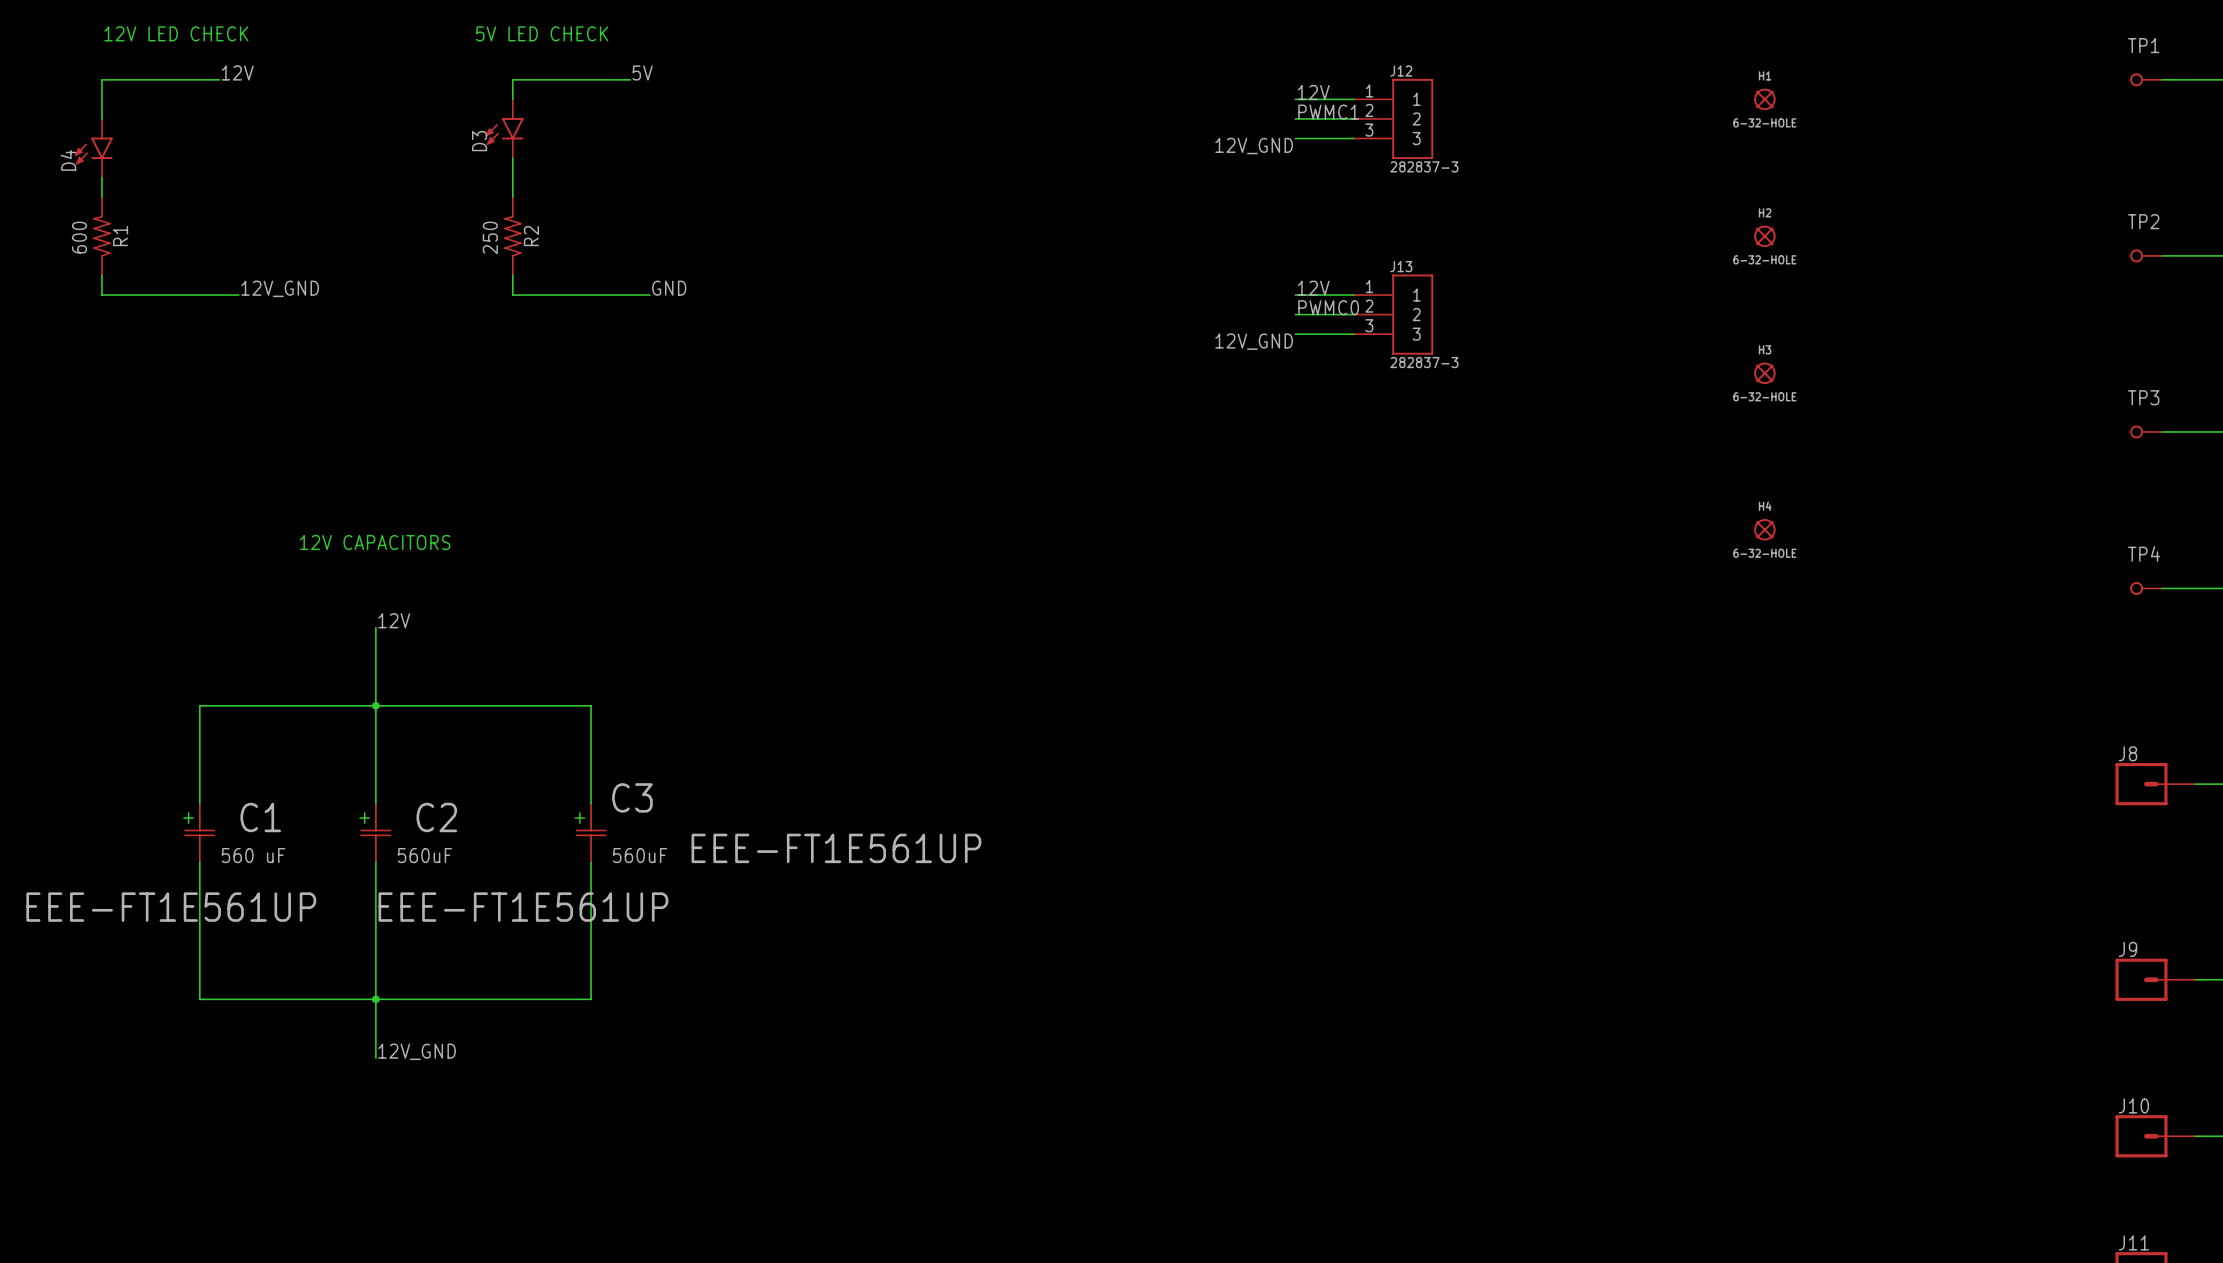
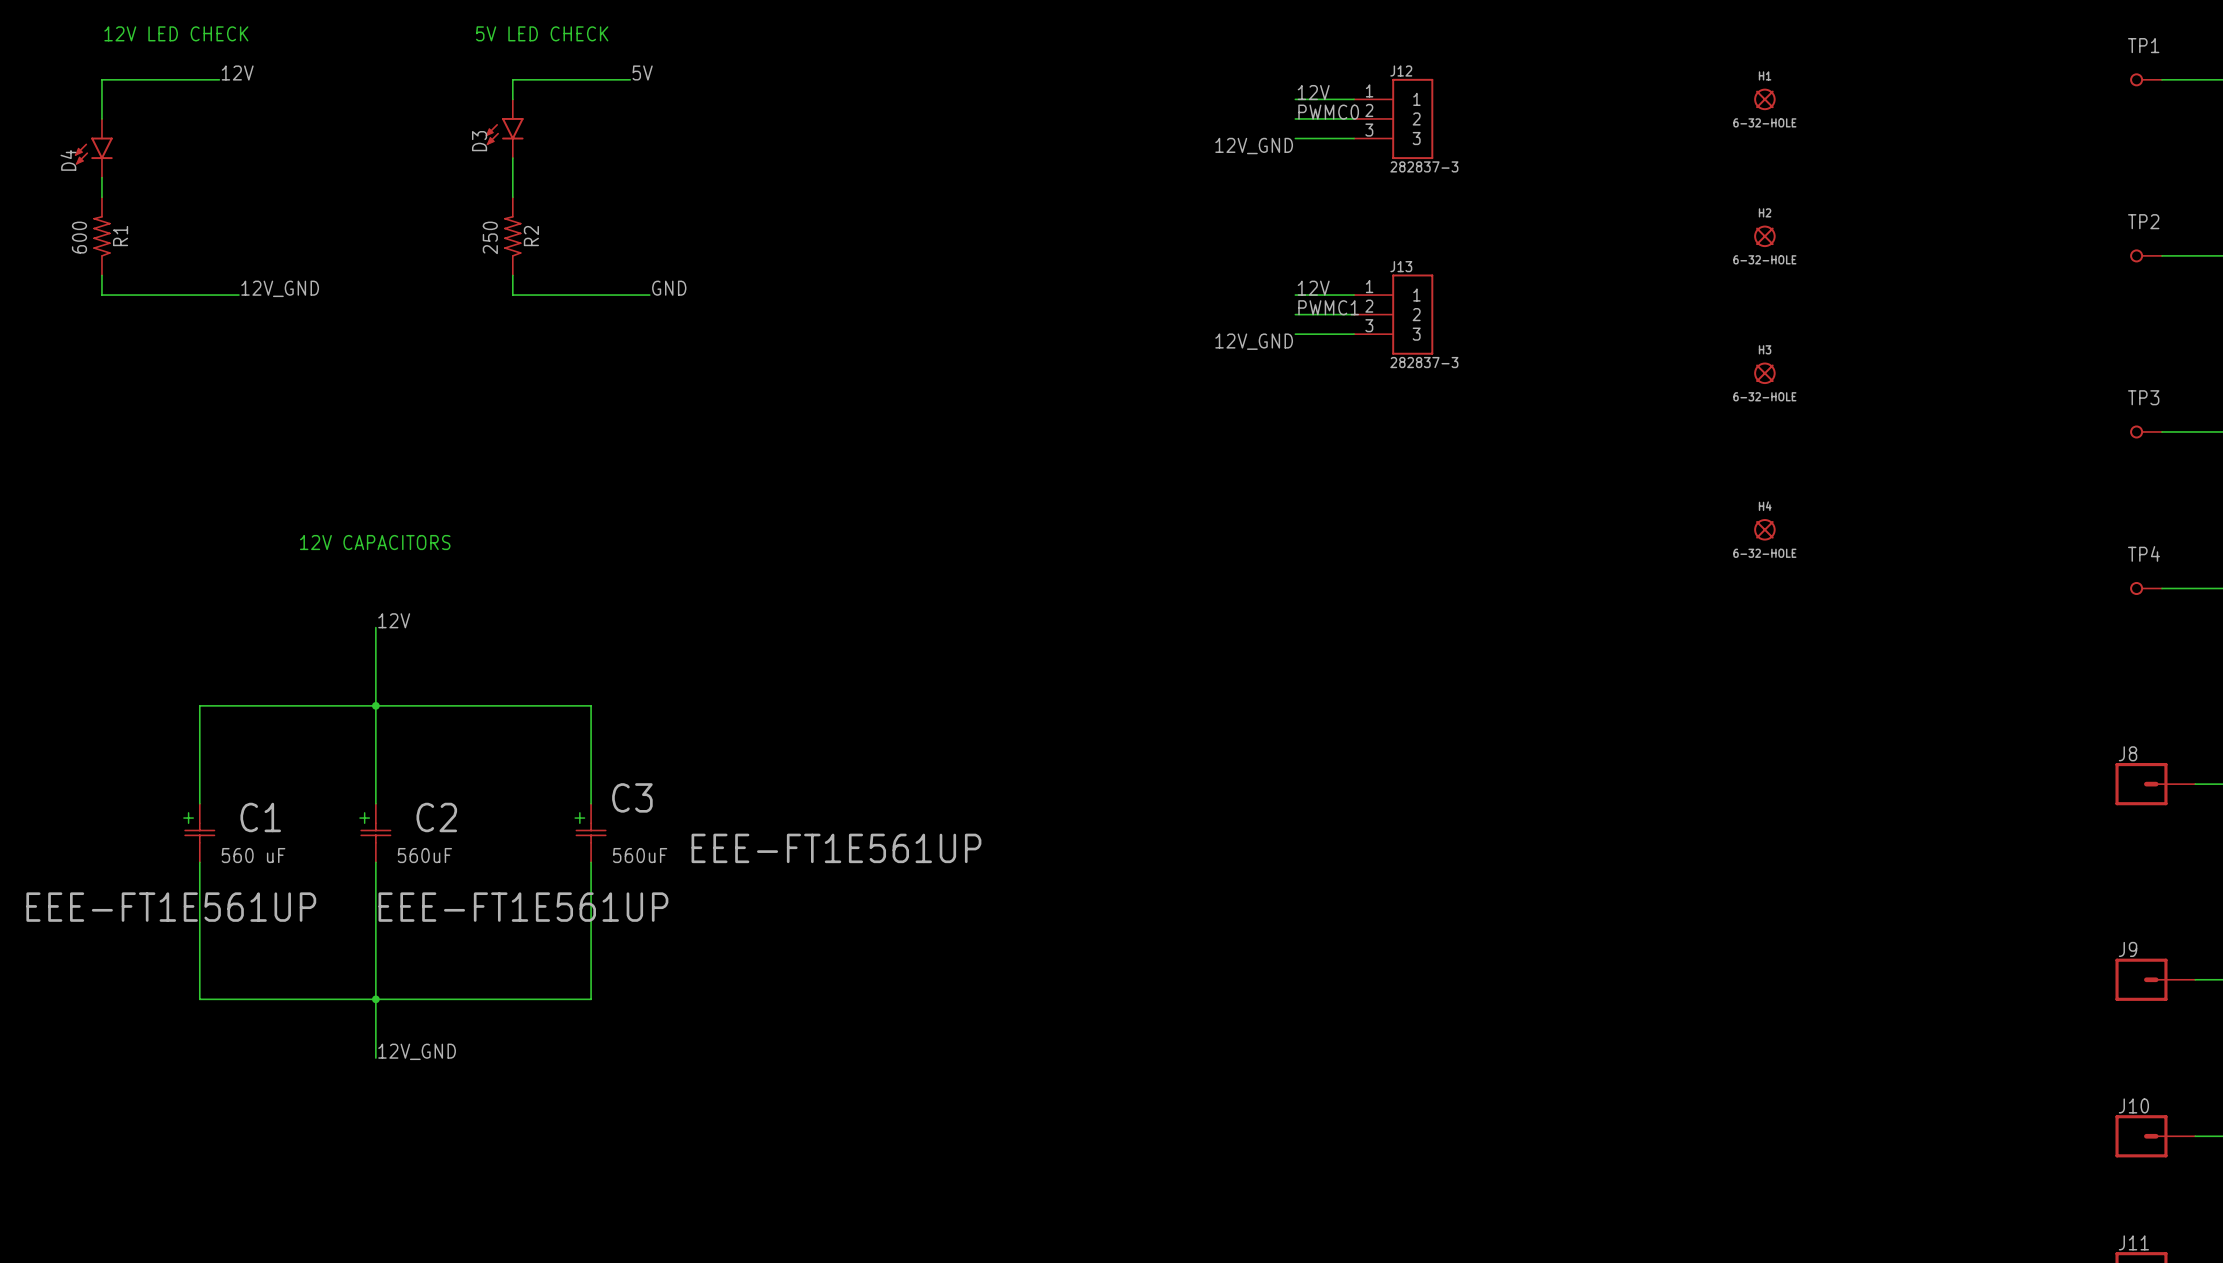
label: PWMC1 (1328, 112) -> PWMC0 (1328, 112)
label: PWMC0 (1328, 307) -> PWMC1 (1328, 307)

